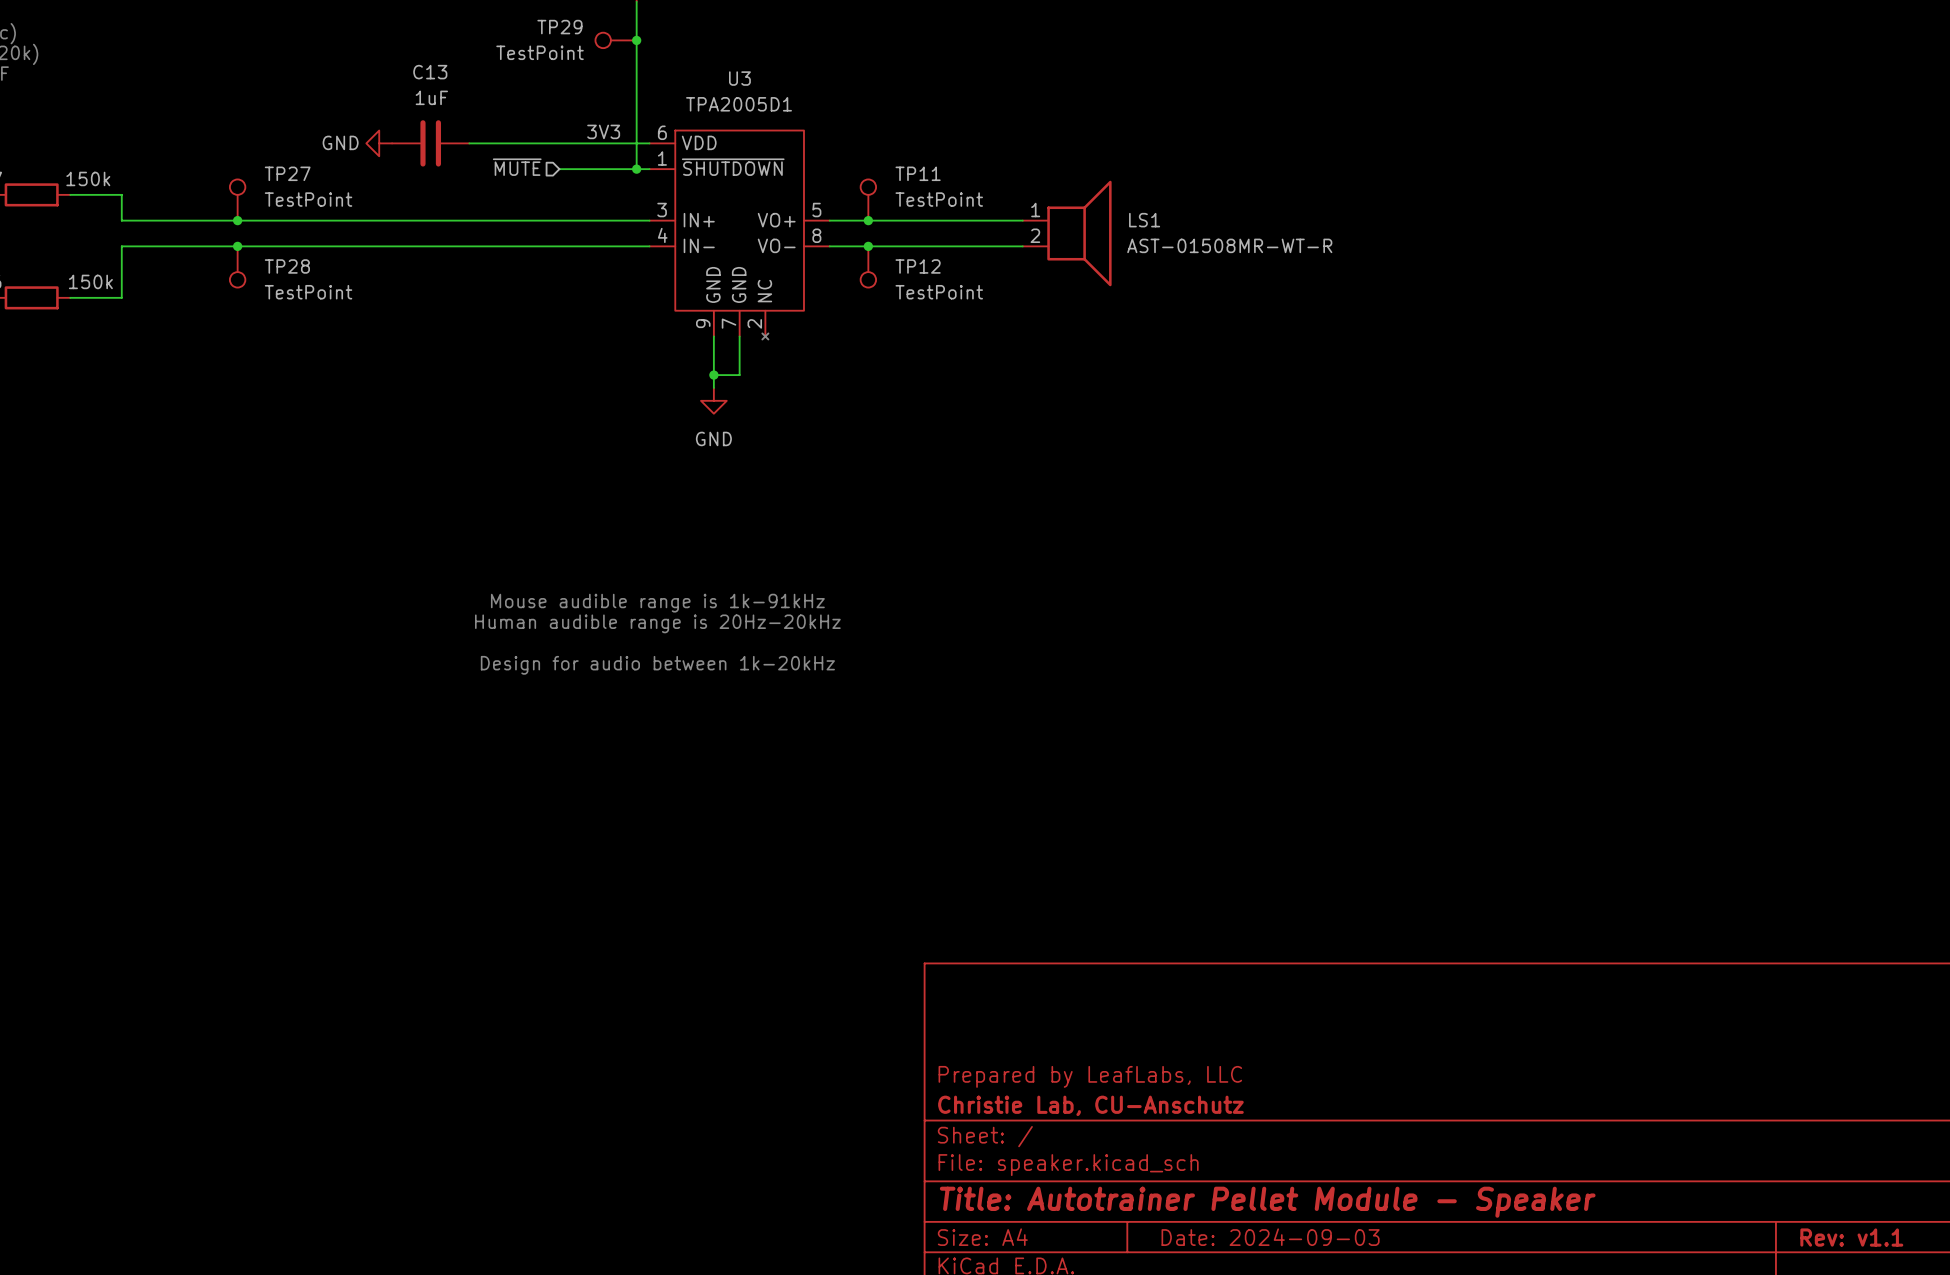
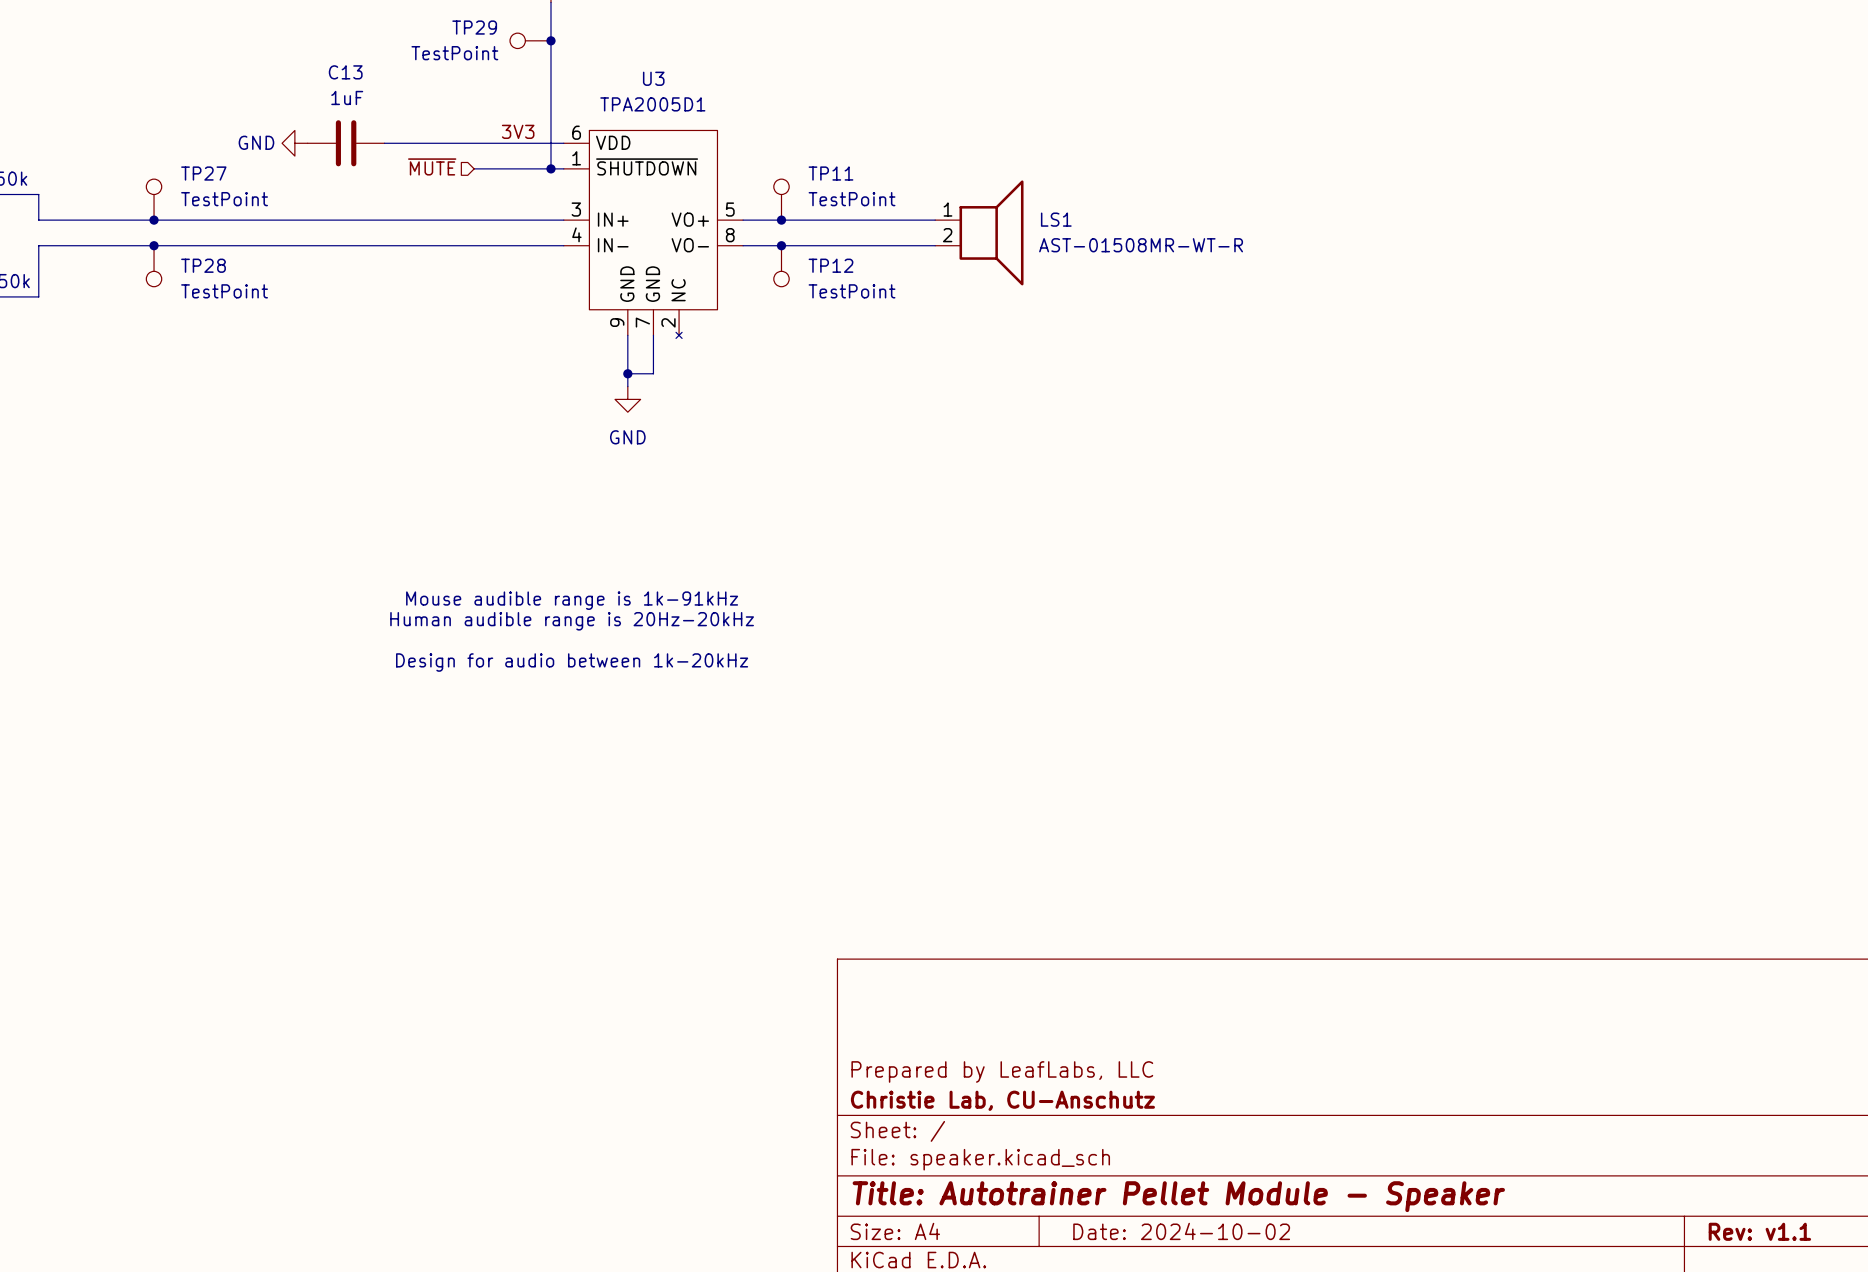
title block: Date: 2024-09-03 (1270, 1237) -> Date: 2024-10-02 (1181, 1231)

